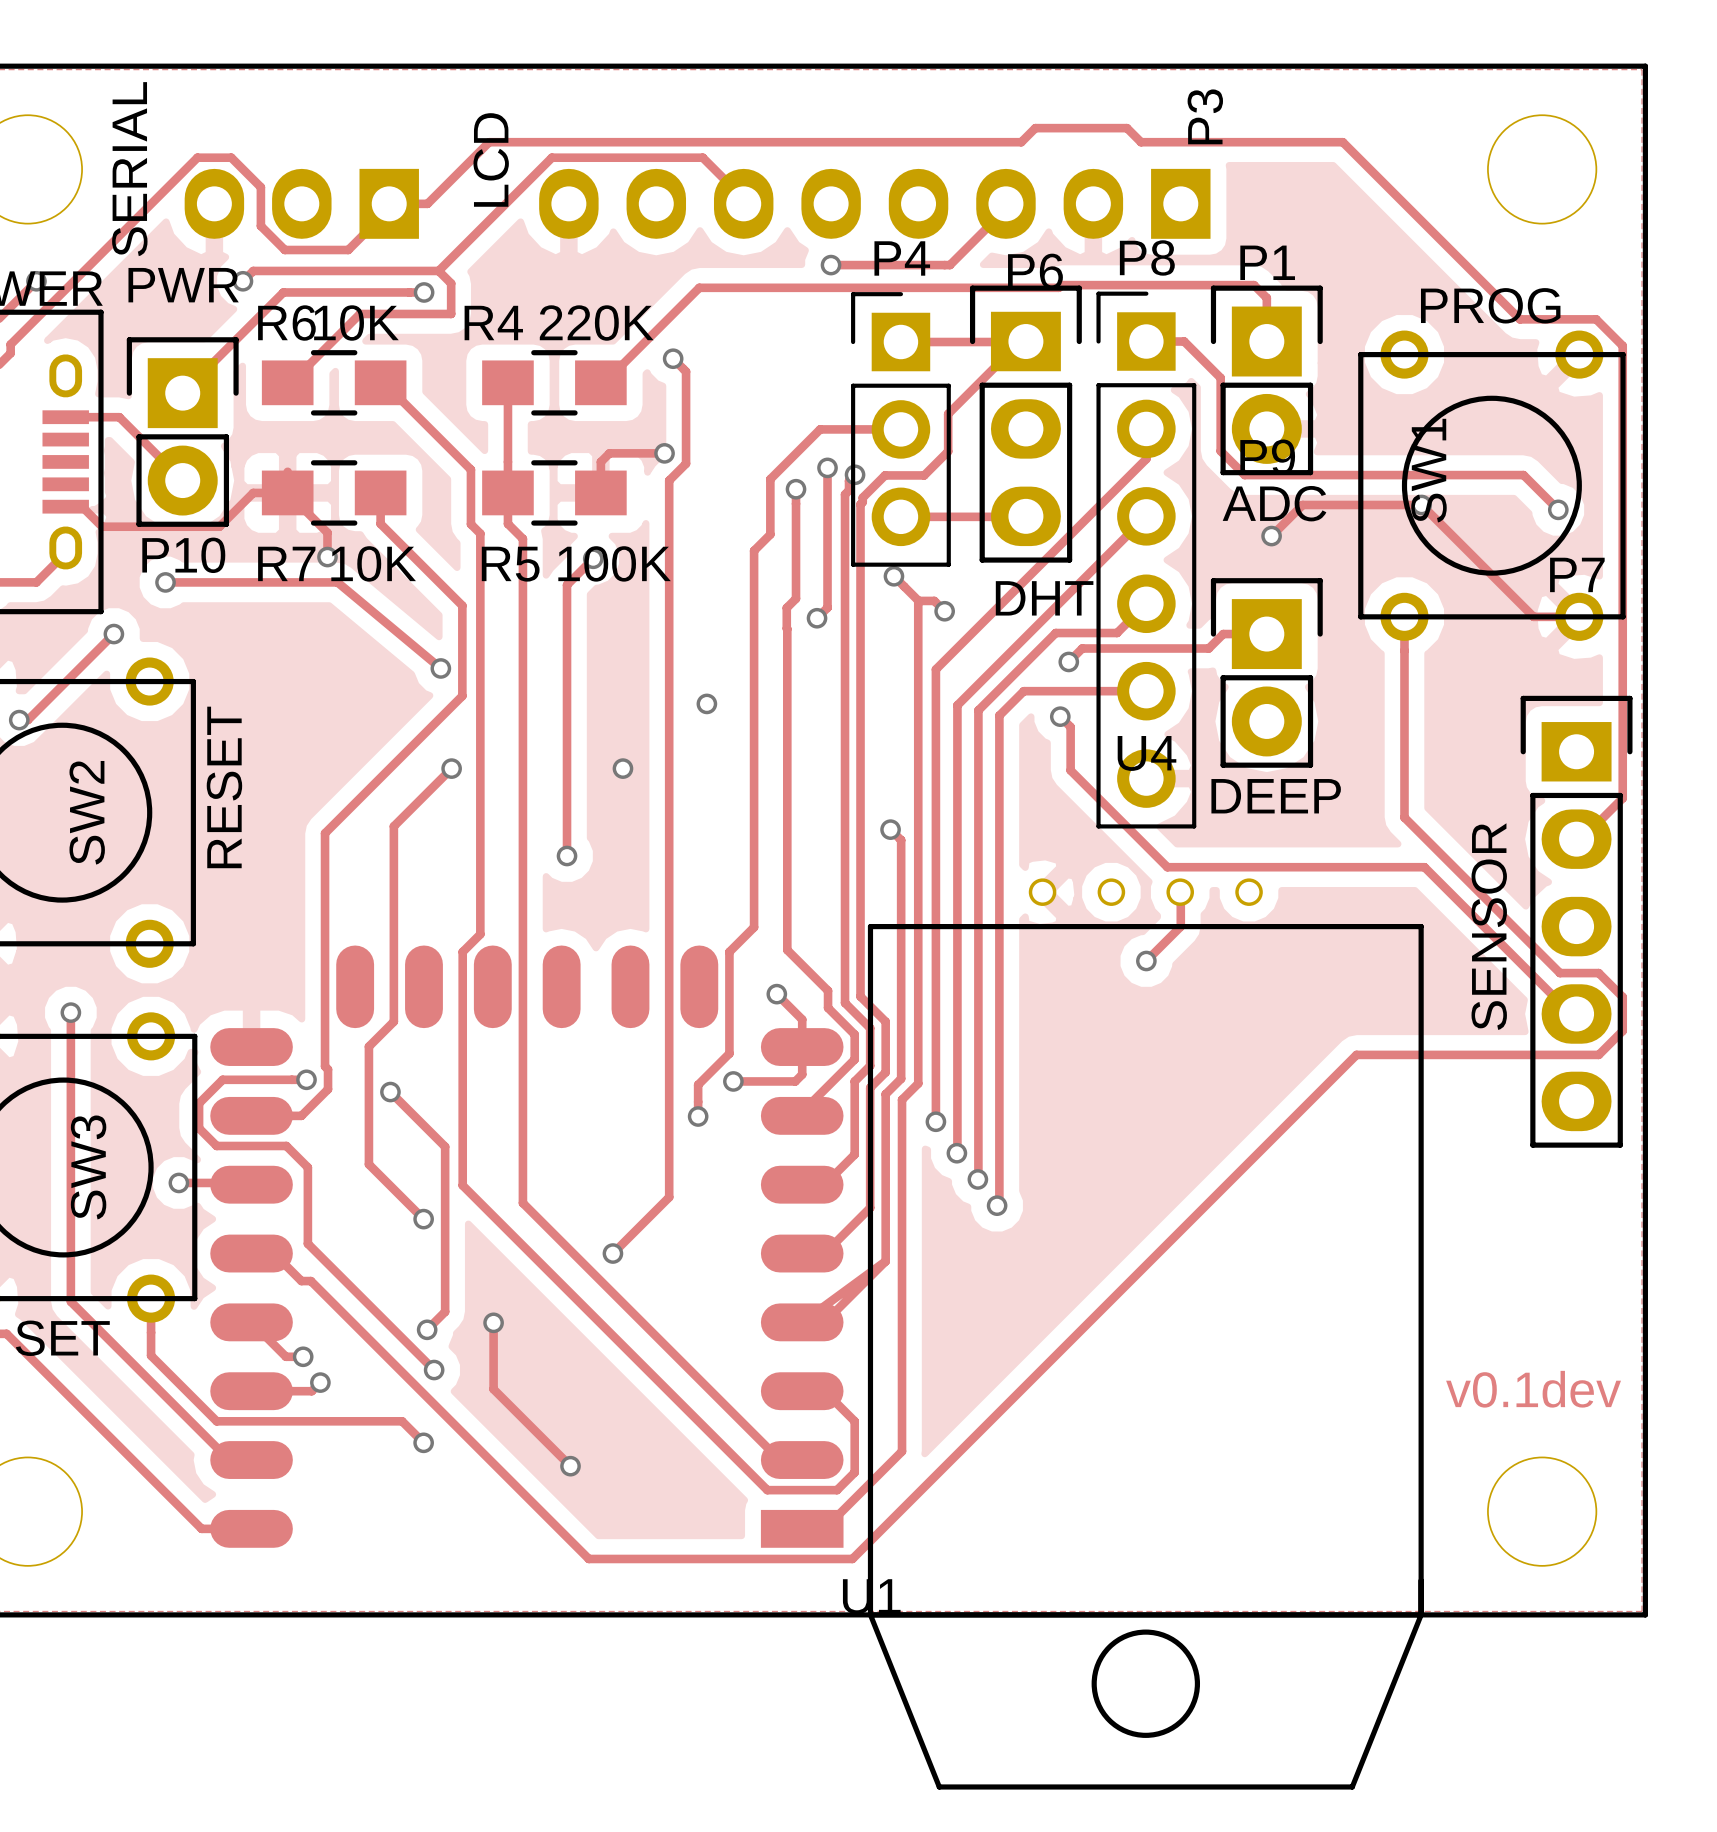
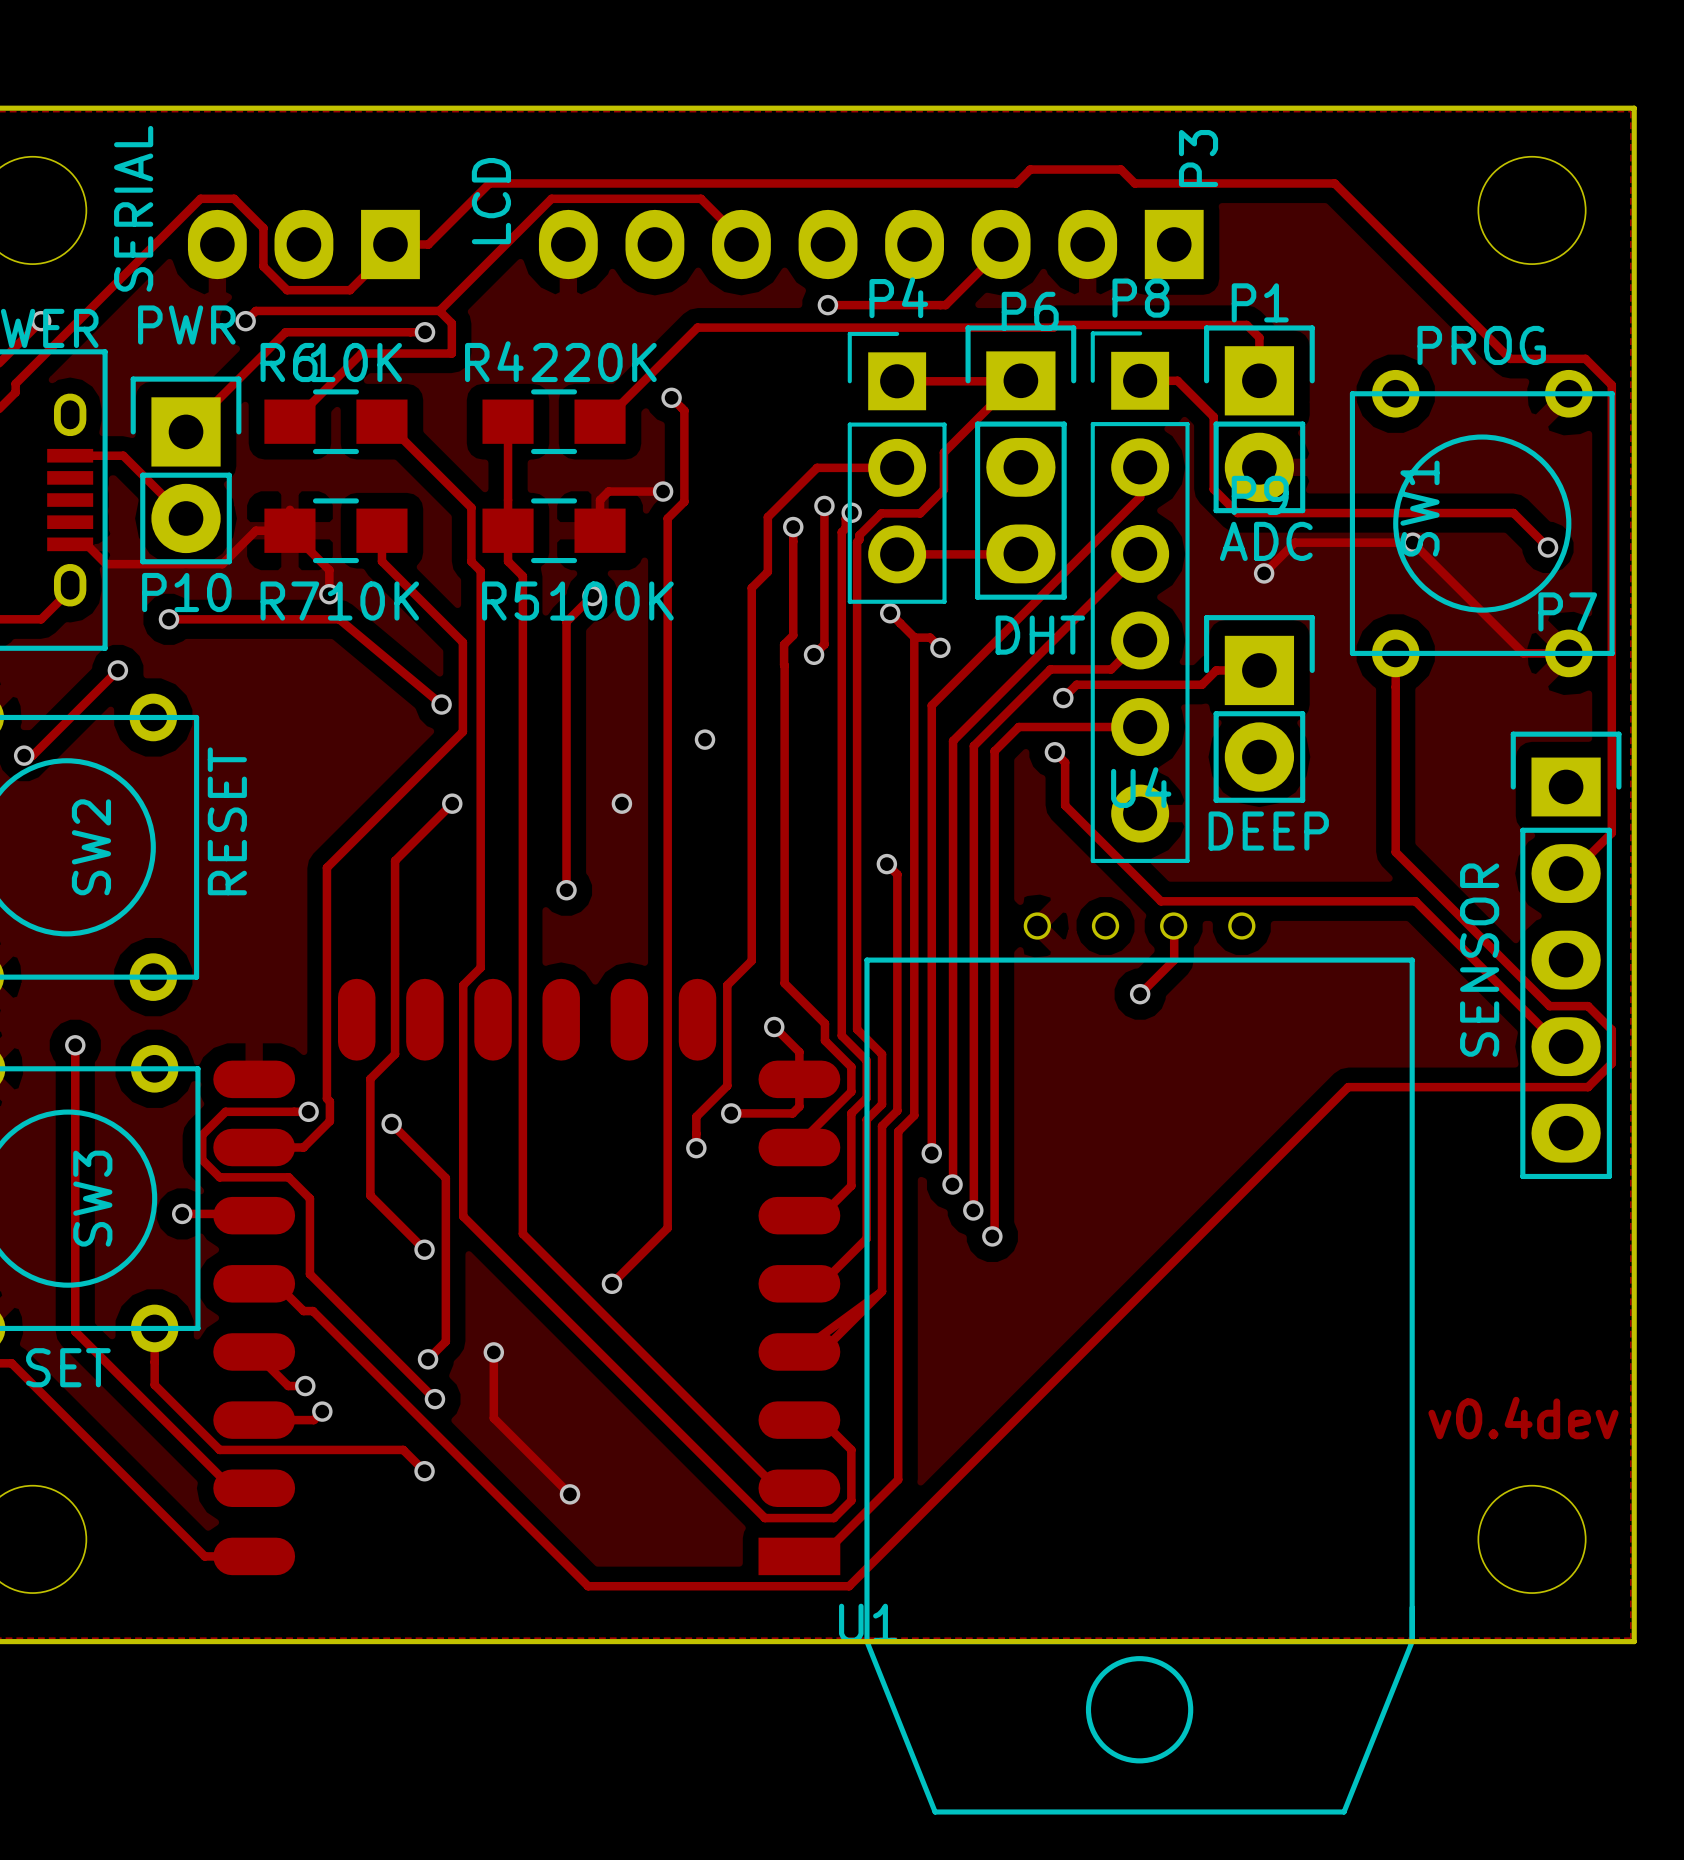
text: v0.1dev (1533, 1389) -> v0.4dev (1523, 1418)

